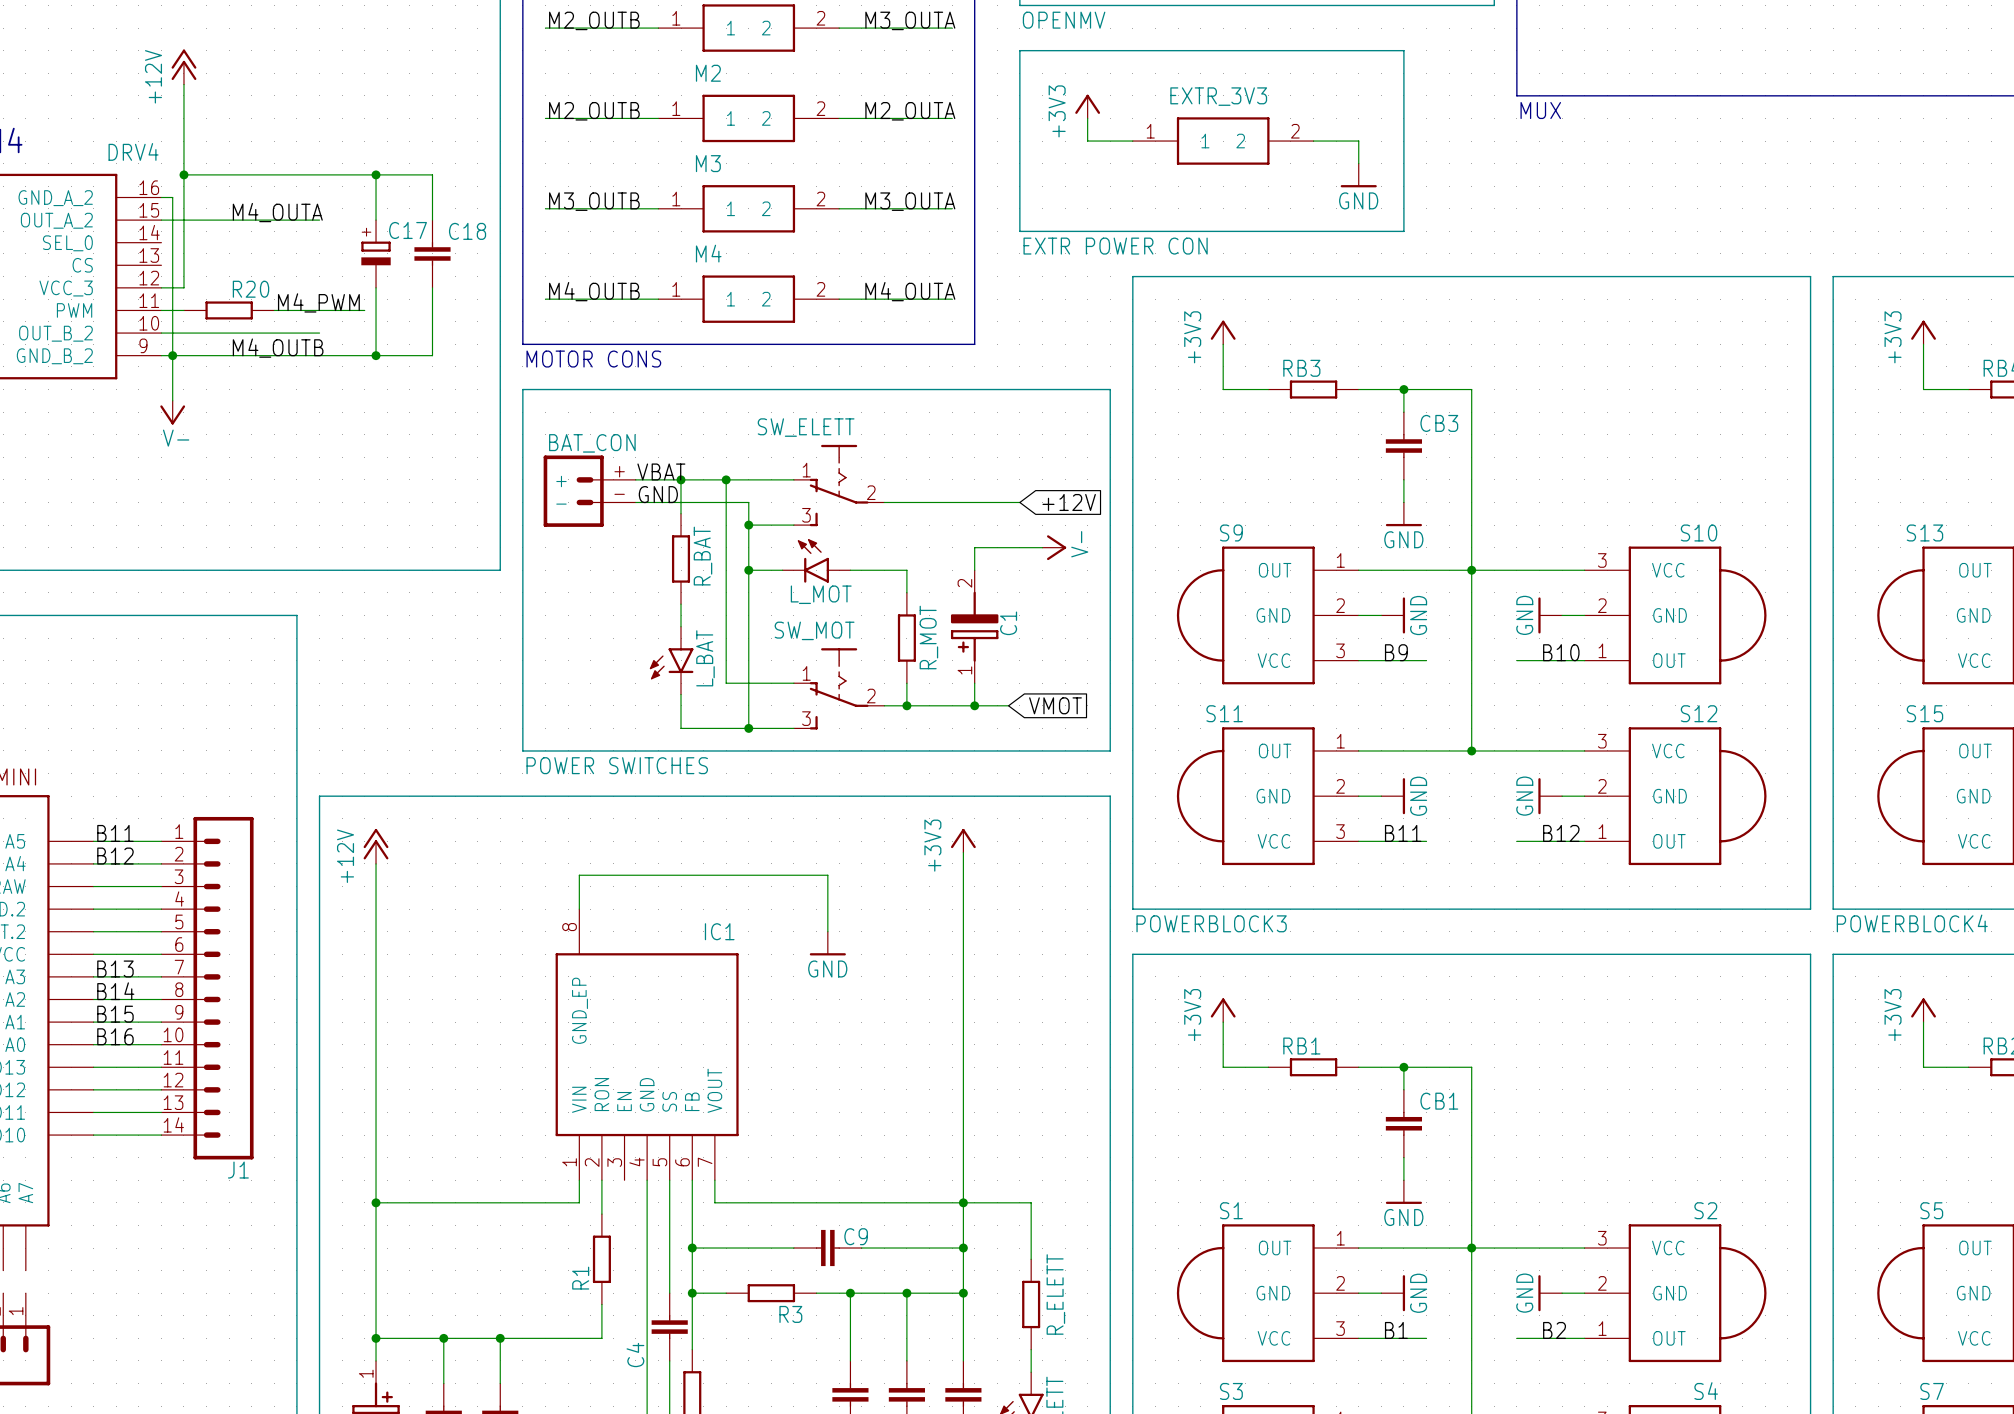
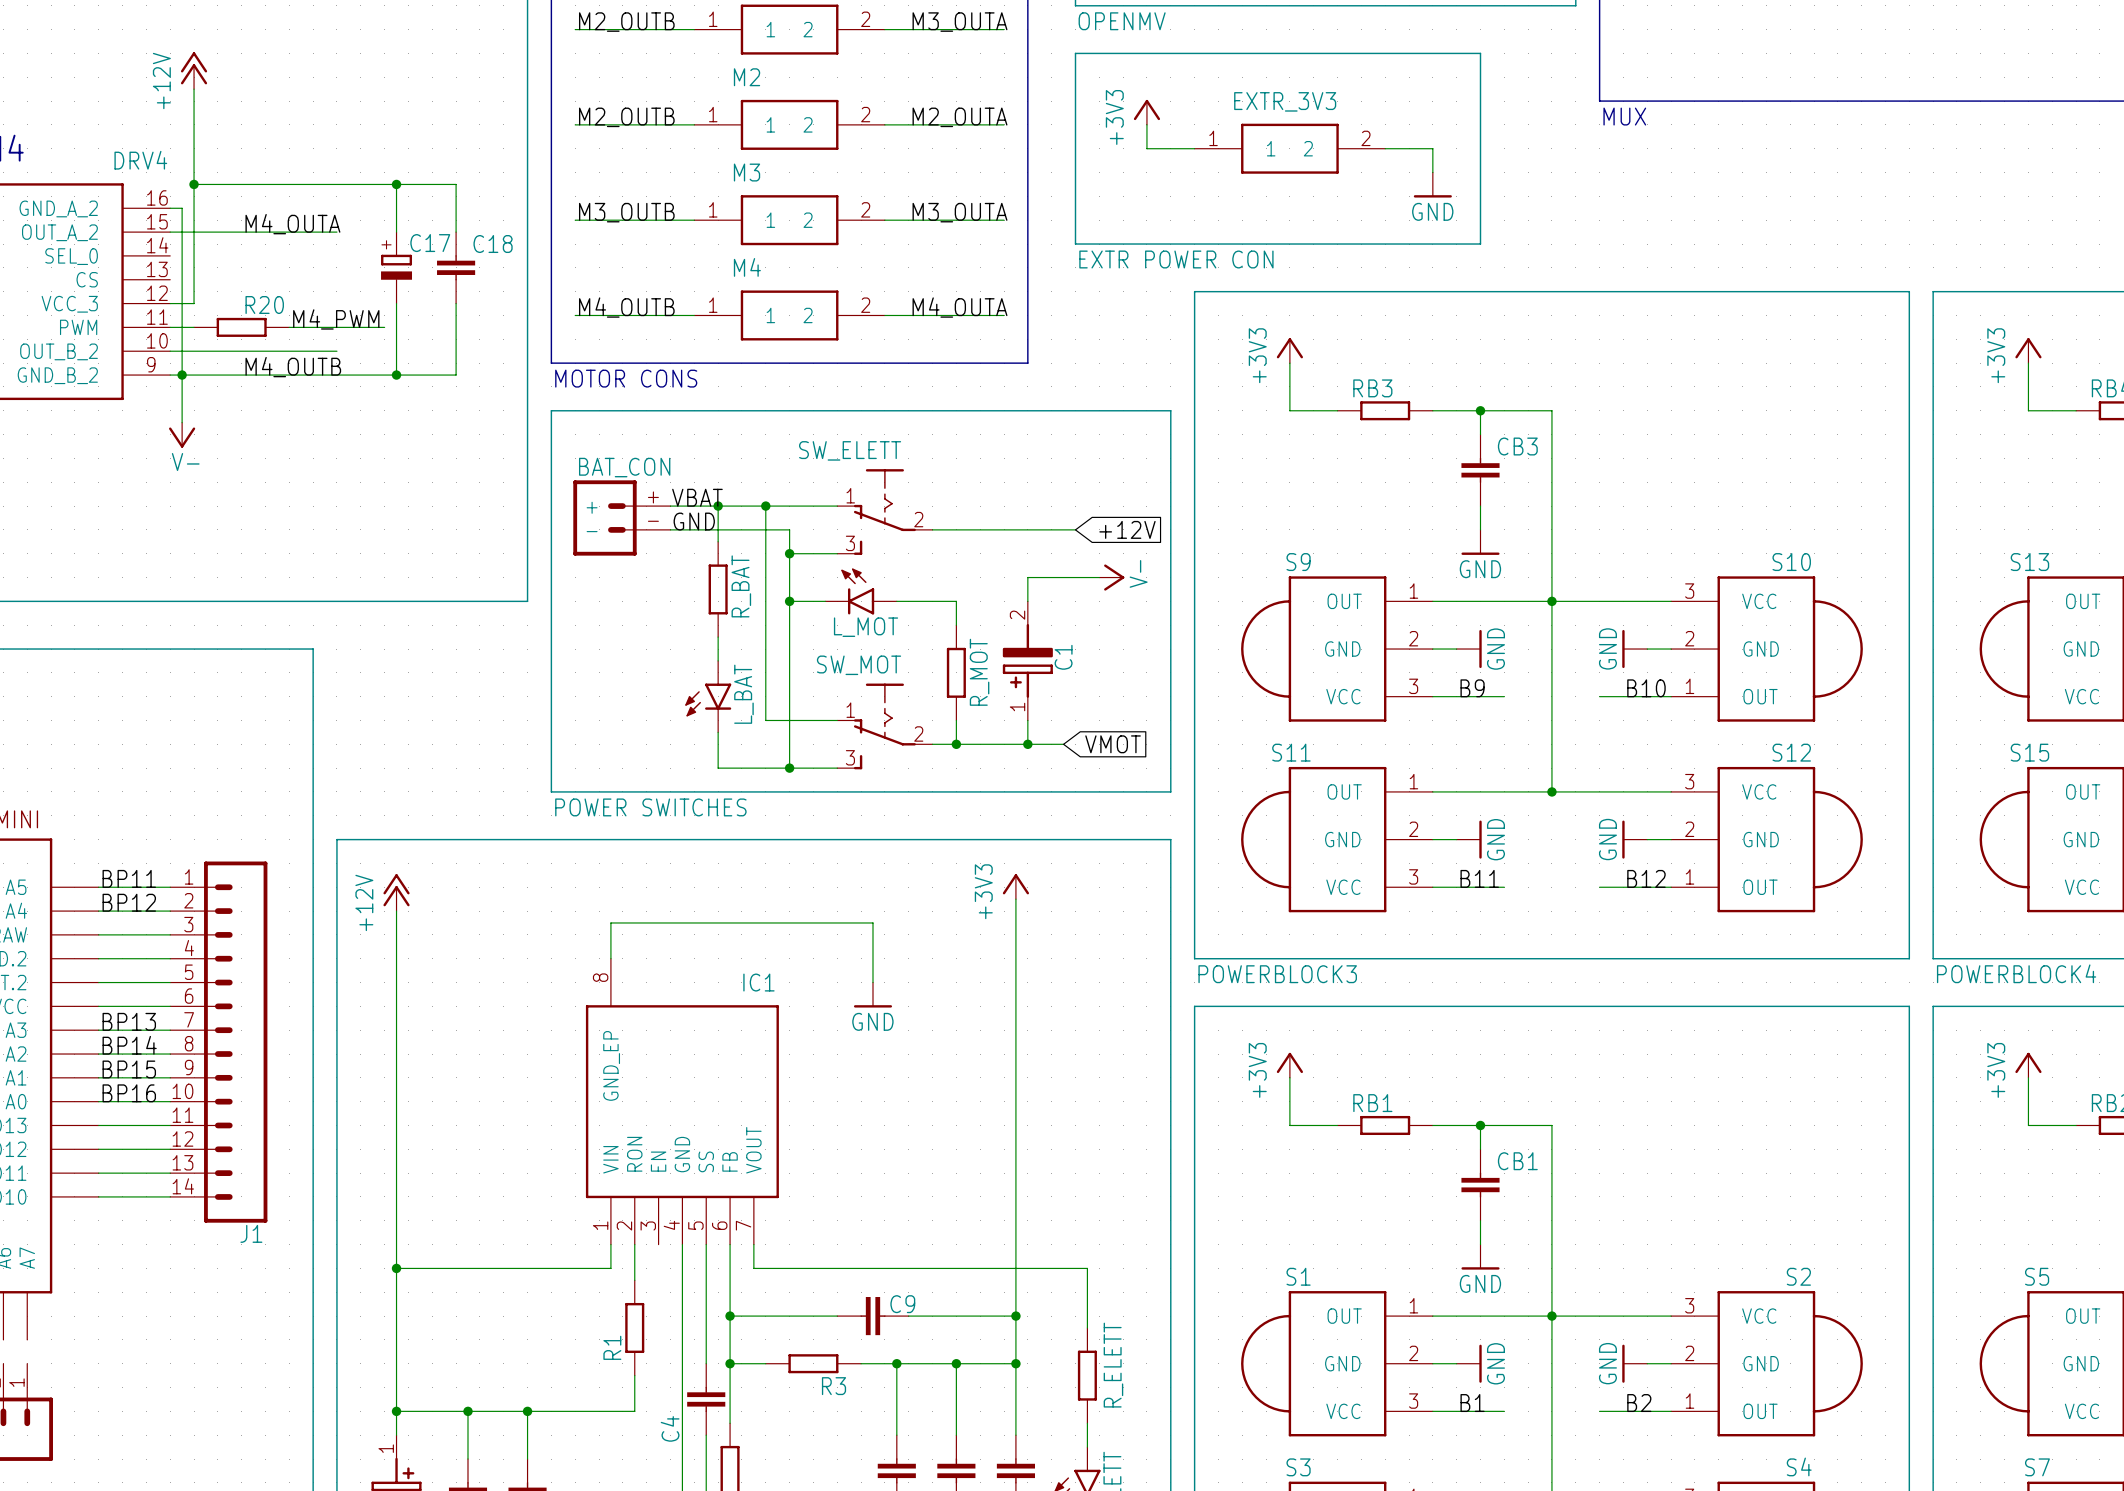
label: B11 (115, 833) -> BP11 (129, 878)
label: B12 (115, 856) -> BP12 (129, 902)
label: B13 (115, 969) -> BP13 (129, 1021)
label: B14 (115, 991) -> BP14 (129, 1045)
label: B15 (115, 1014) -> BP15 (129, 1069)
label: B16 (115, 1036) -> BP16 (129, 1093)
junction: (963, 1202) -> none

